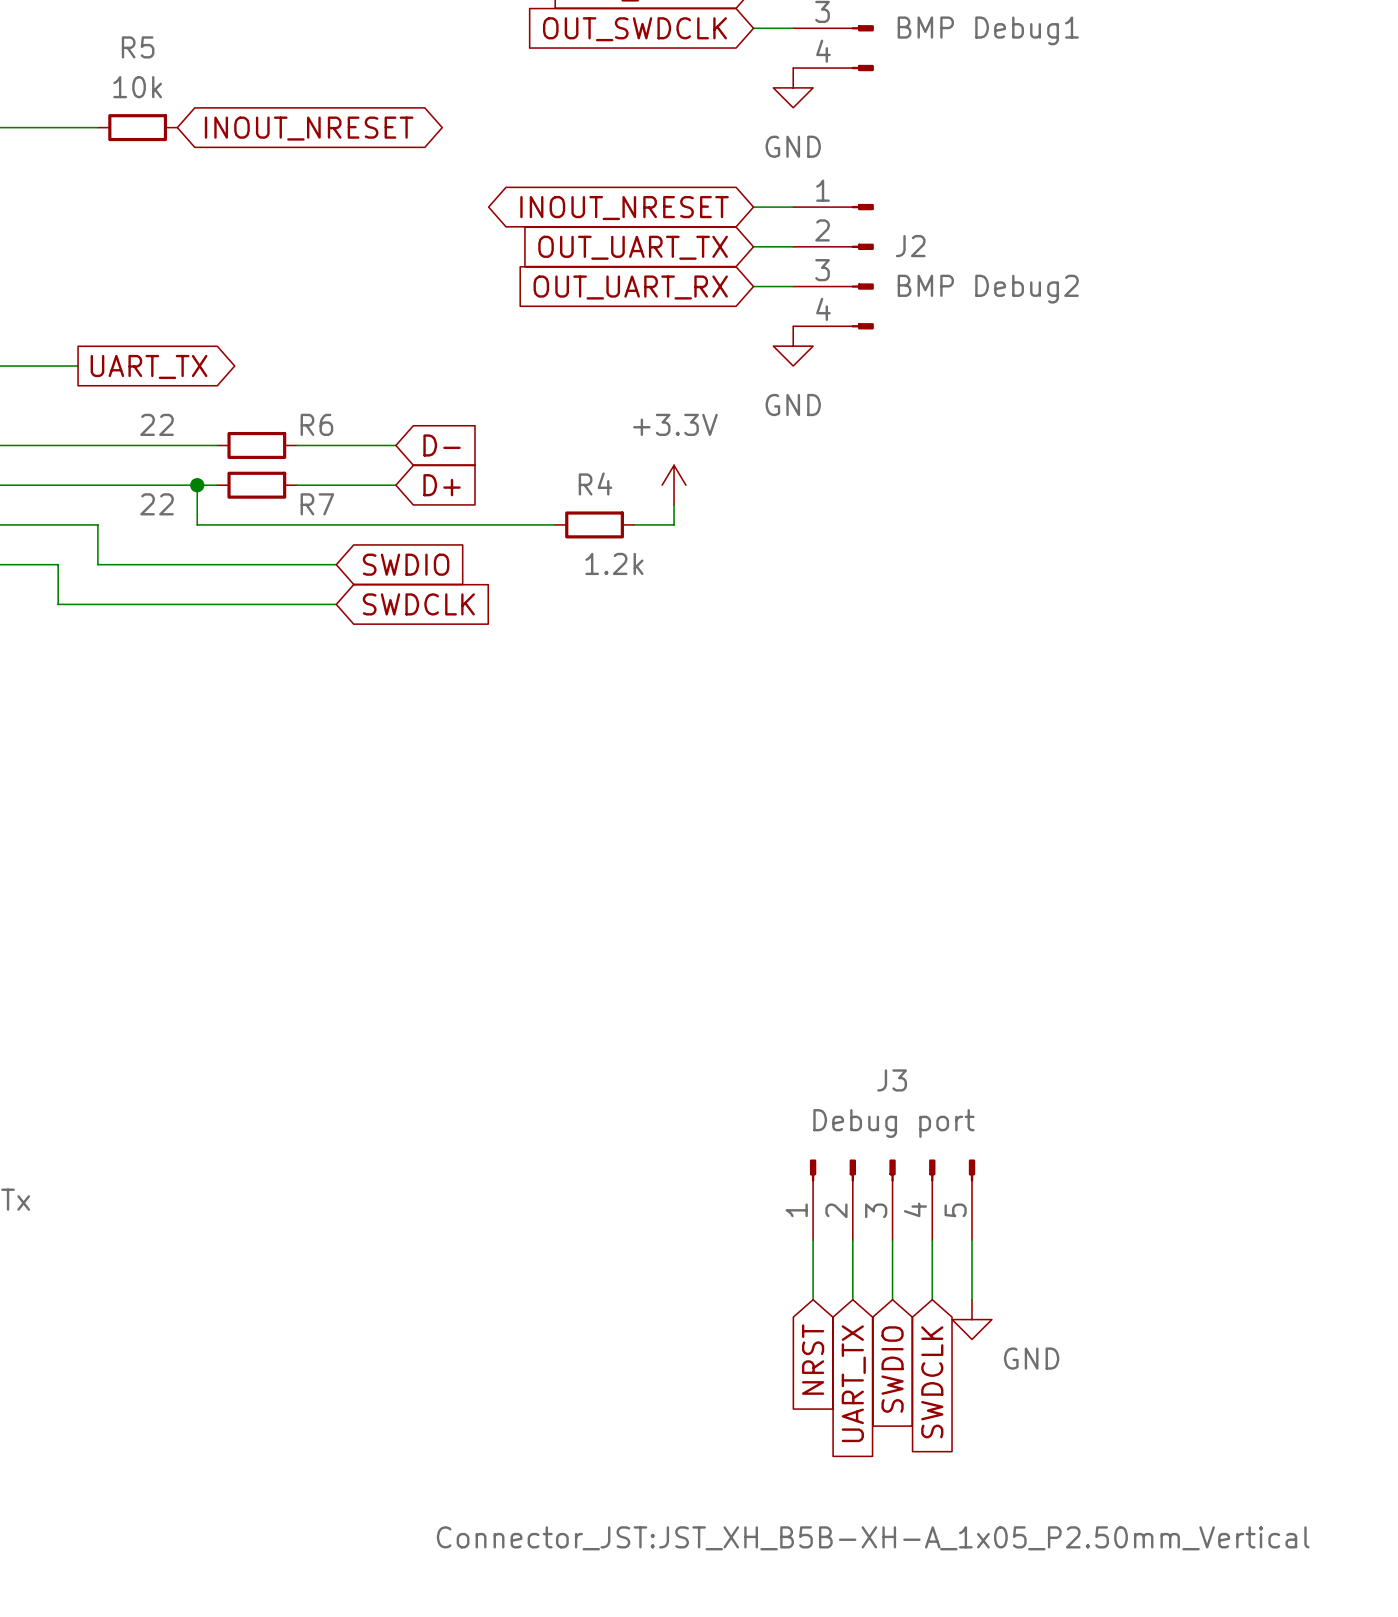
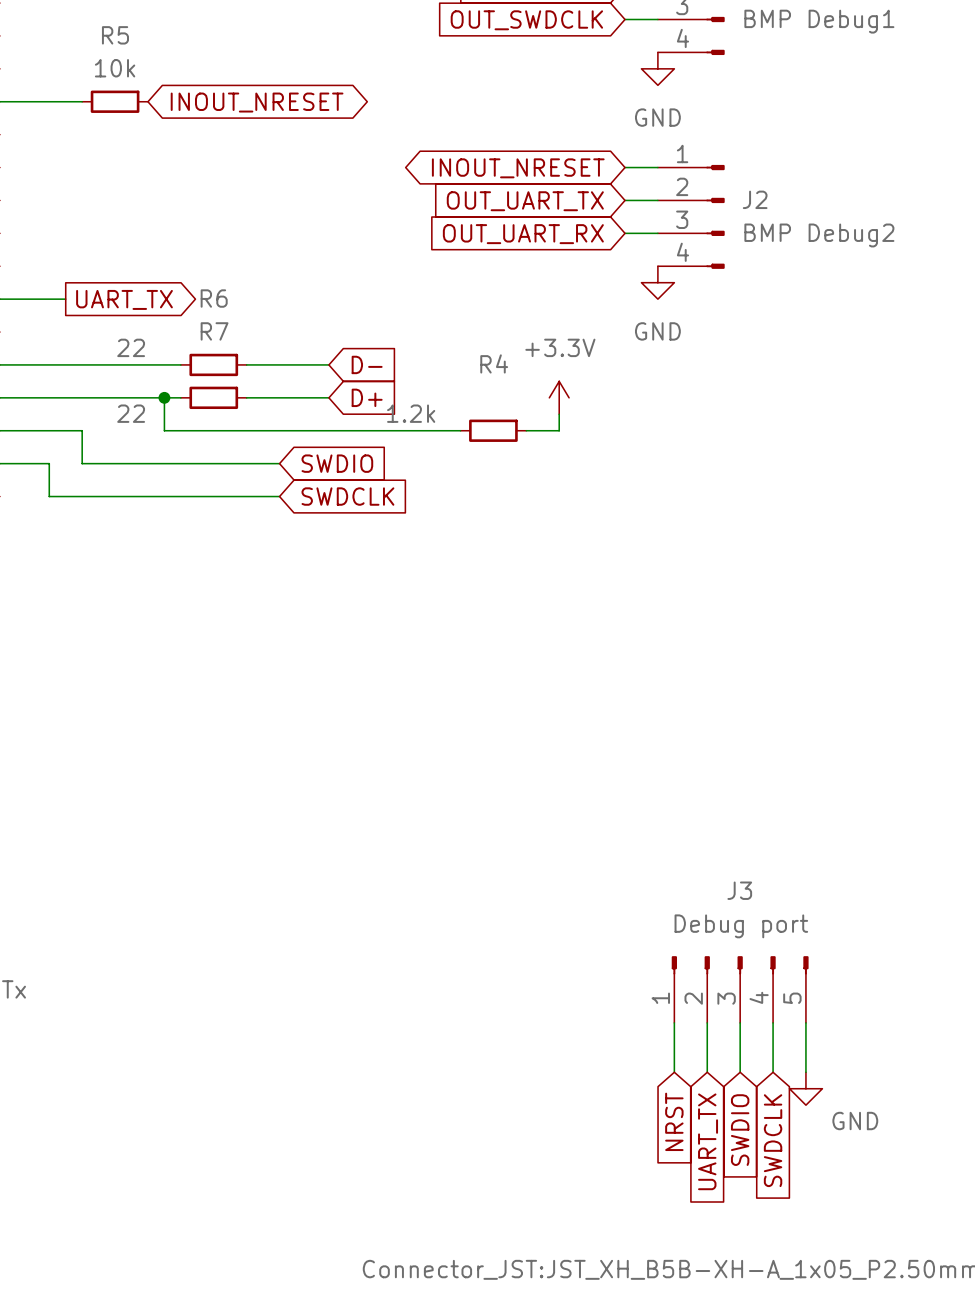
R6 name position: R6 (316, 424) -> R6 (214, 298)
R4 name position: R4 (595, 484) -> R4 (494, 363)
R7 name position: R7 (317, 504) -> R7 (214, 331)
R4 value position: 1.2k (614, 563) -> 1.2k (411, 413)

